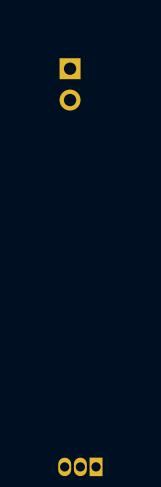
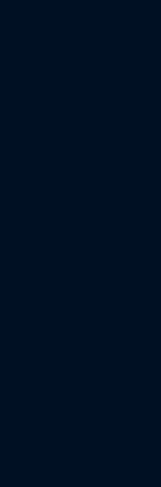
part: (70, 84) -> none
part: (80, 466) -> none

